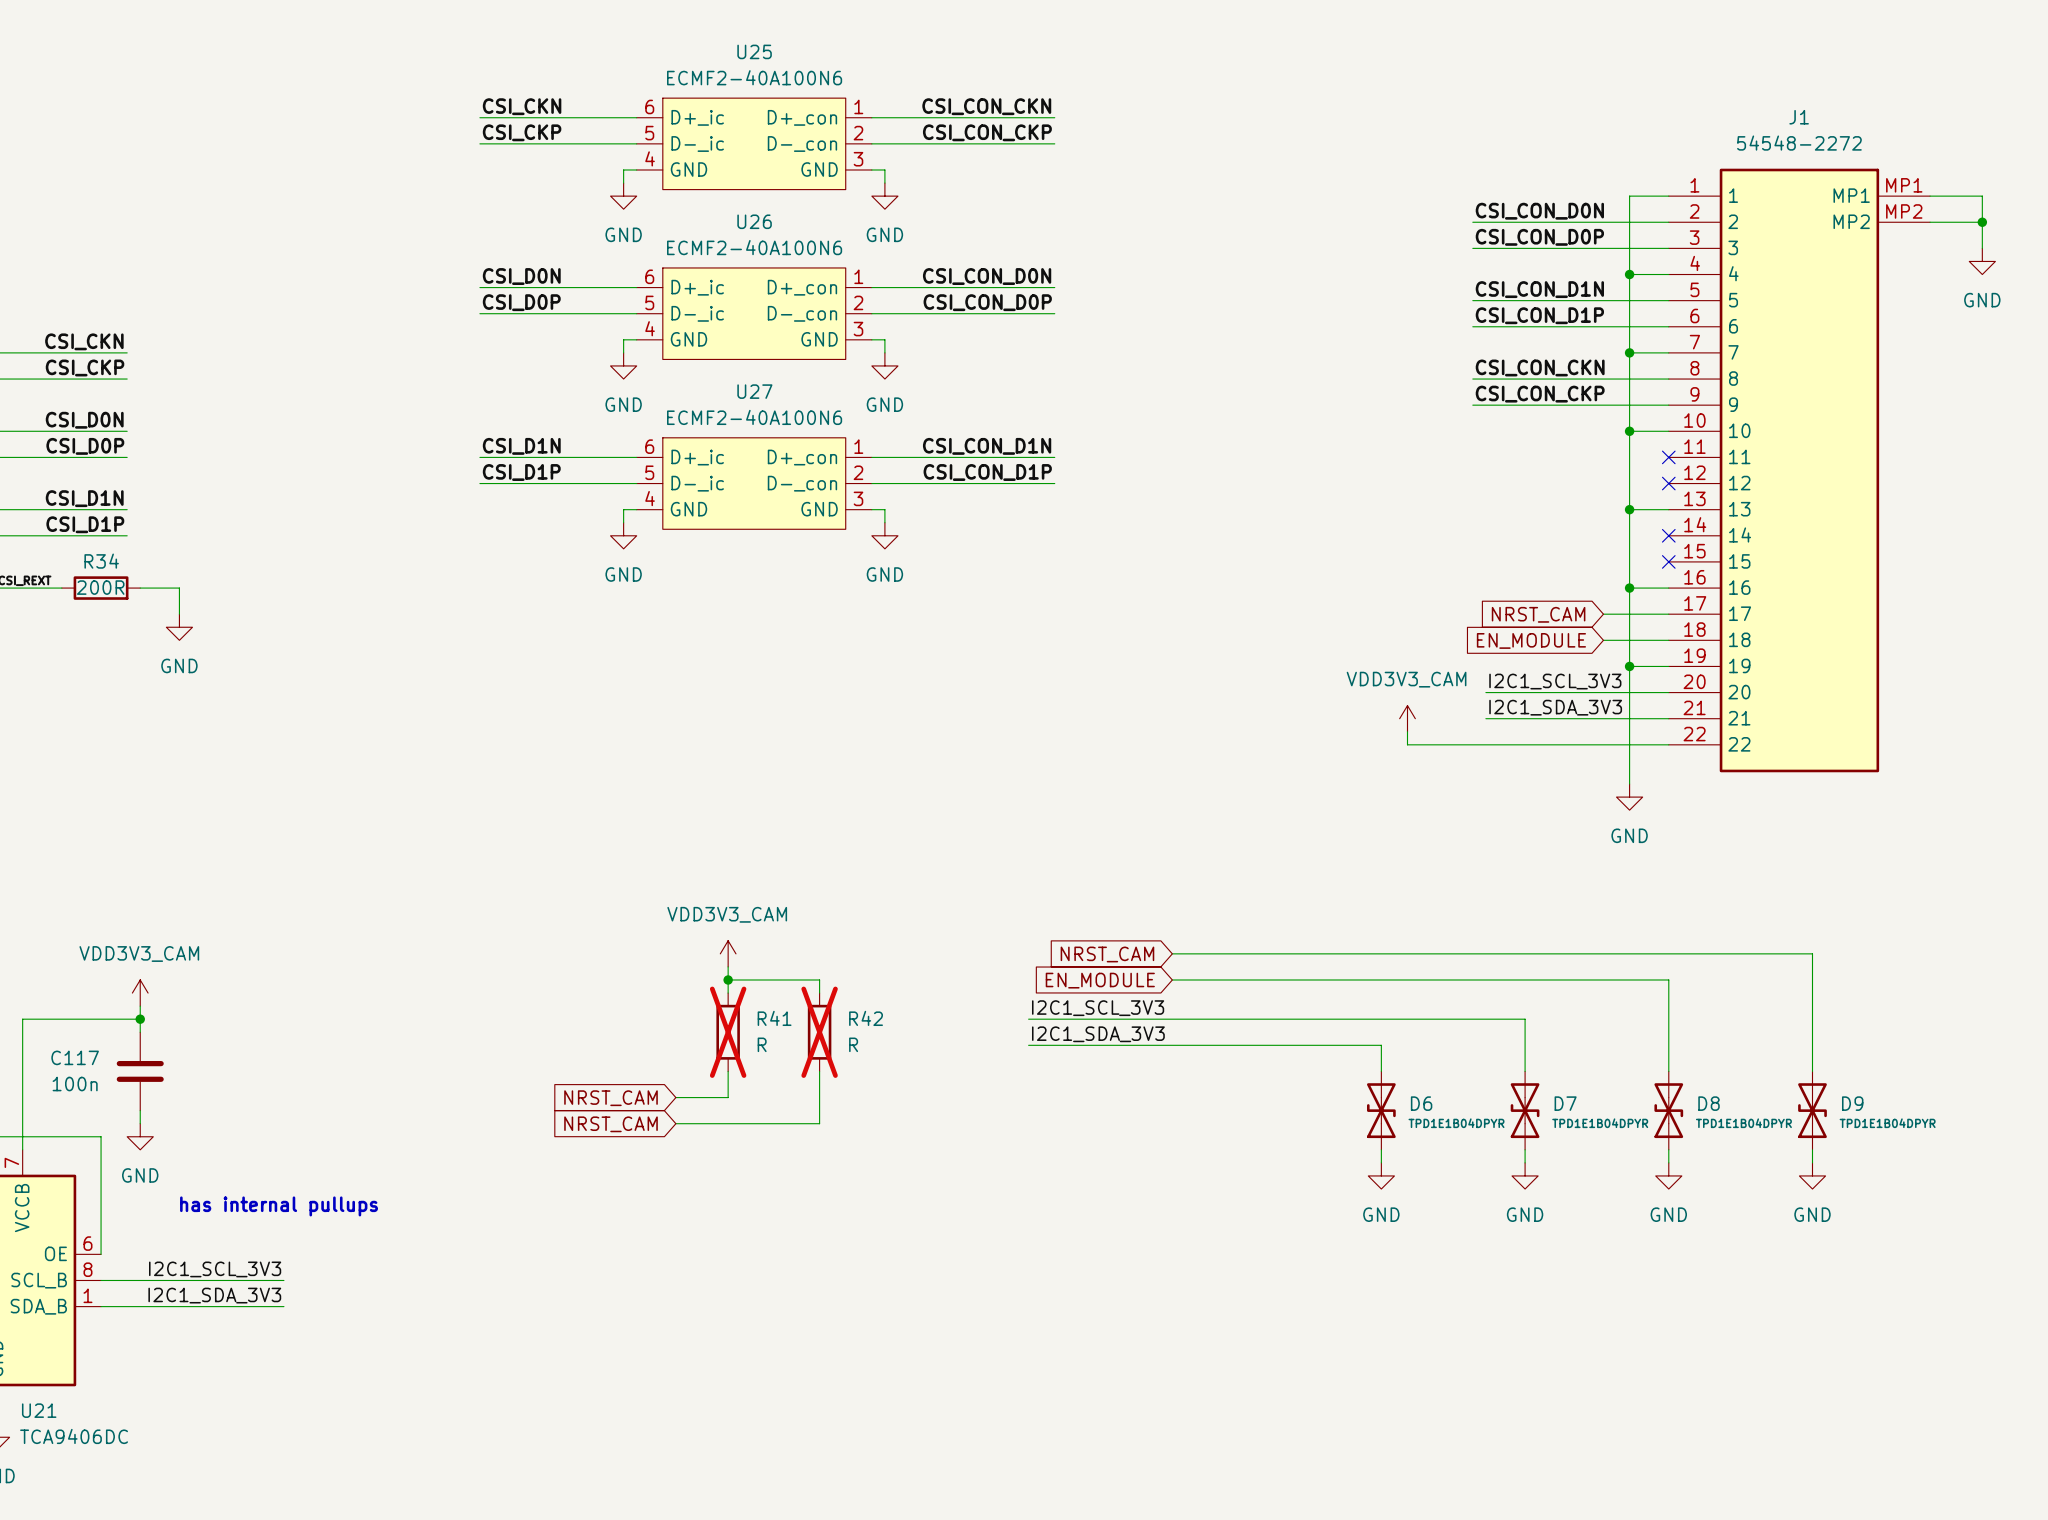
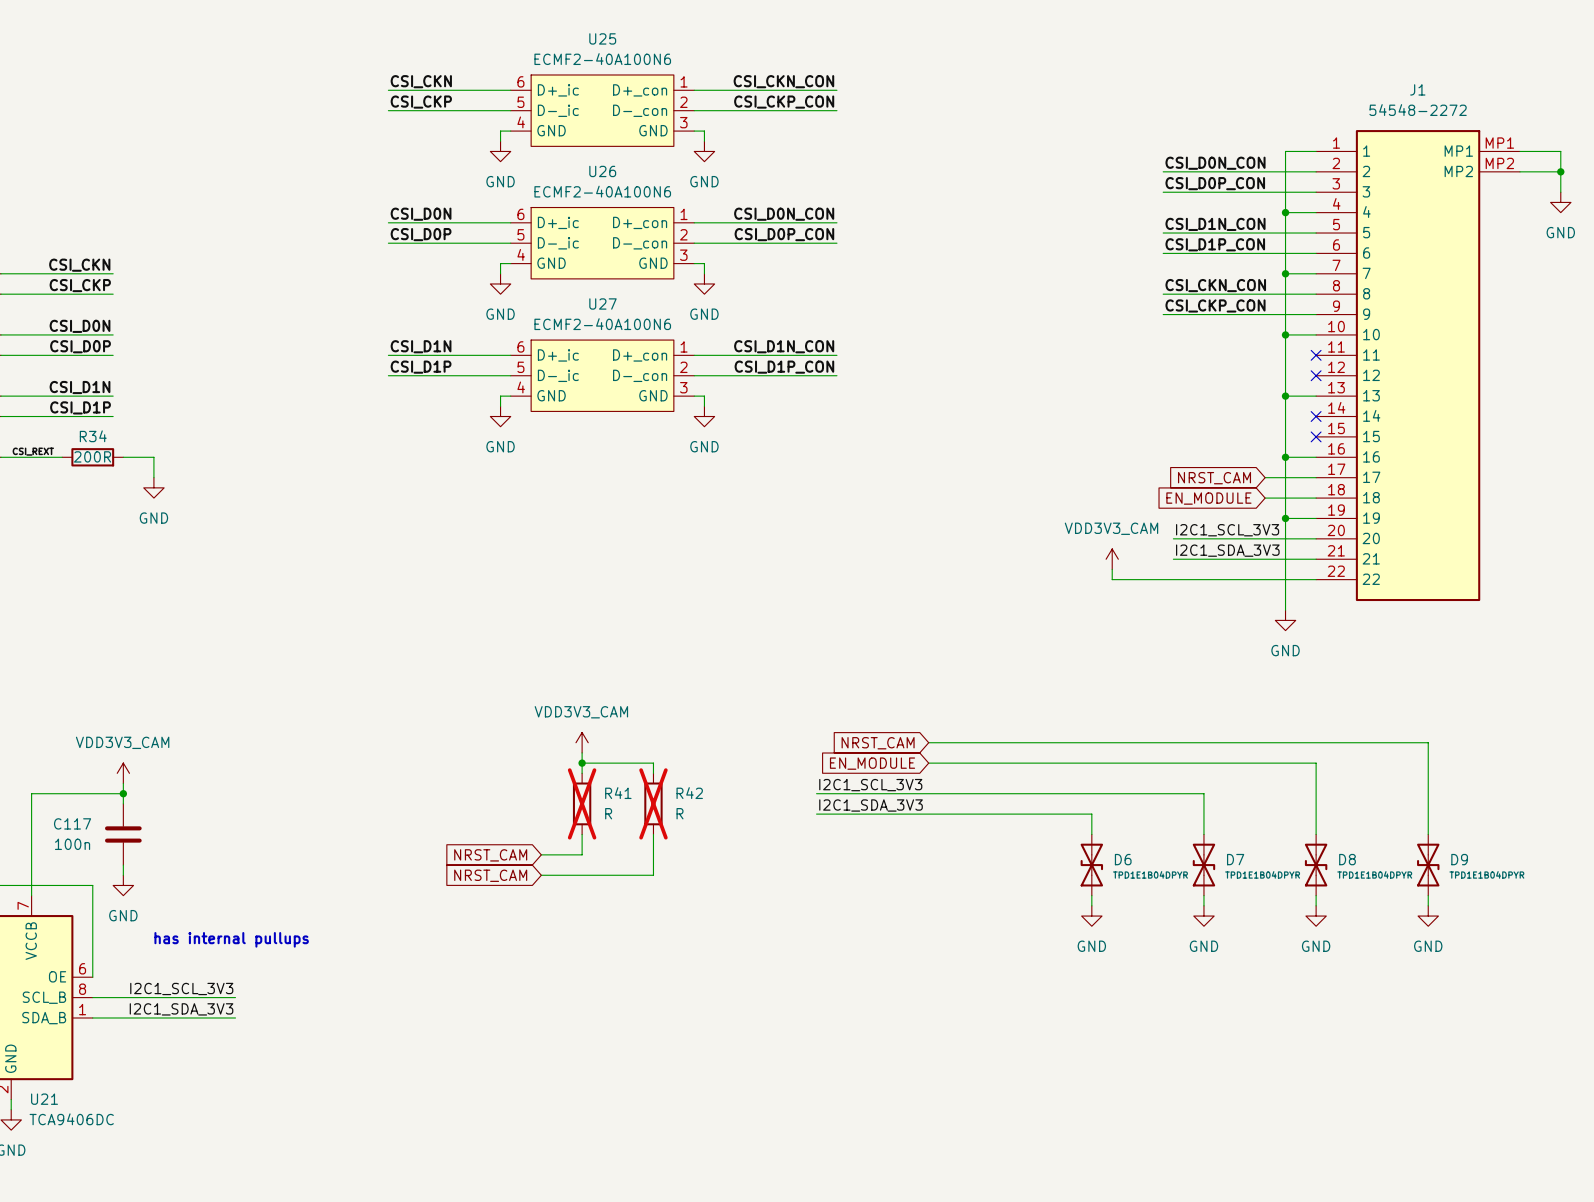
label: CSI_CON_CKN (986, 106) -> CSI_CKN_CON (783, 81)
label: CSI_CON_CKP (987, 132) -> CSI_CKP_CON (784, 102)
label: CSI_CON_D0N (1539, 211) -> CSI_D0N_CON (1215, 163)
label: CSI_CON_D0P (1539, 237) -> CSI_D0P_CON (1215, 183)
label: CSI_CON_D0N (987, 276) -> CSI_D0N_CON (784, 214)
label: CSI_CON_D1N (1539, 289) -> CSI_D1N_CON (1215, 224)
label: CSI_CON_D0P (987, 302) -> CSI_D0P_CON (784, 234)
label: CSI_CON_D1P (1539, 315) -> CSI_D1P_CON (1215, 244)
label: CSI_CON_CKN (1540, 367) -> CSI_CKN_CON (1215, 285)
label: CSI_CON_CKP (1540, 394) -> CSI_CKP_CON (1215, 305)
label: CSI_CON_D1N (987, 446) -> CSI_D1N_CON (784, 346)
label: CSI_CON_D1P (987, 472) -> CSI_D1P_CON (784, 367)

